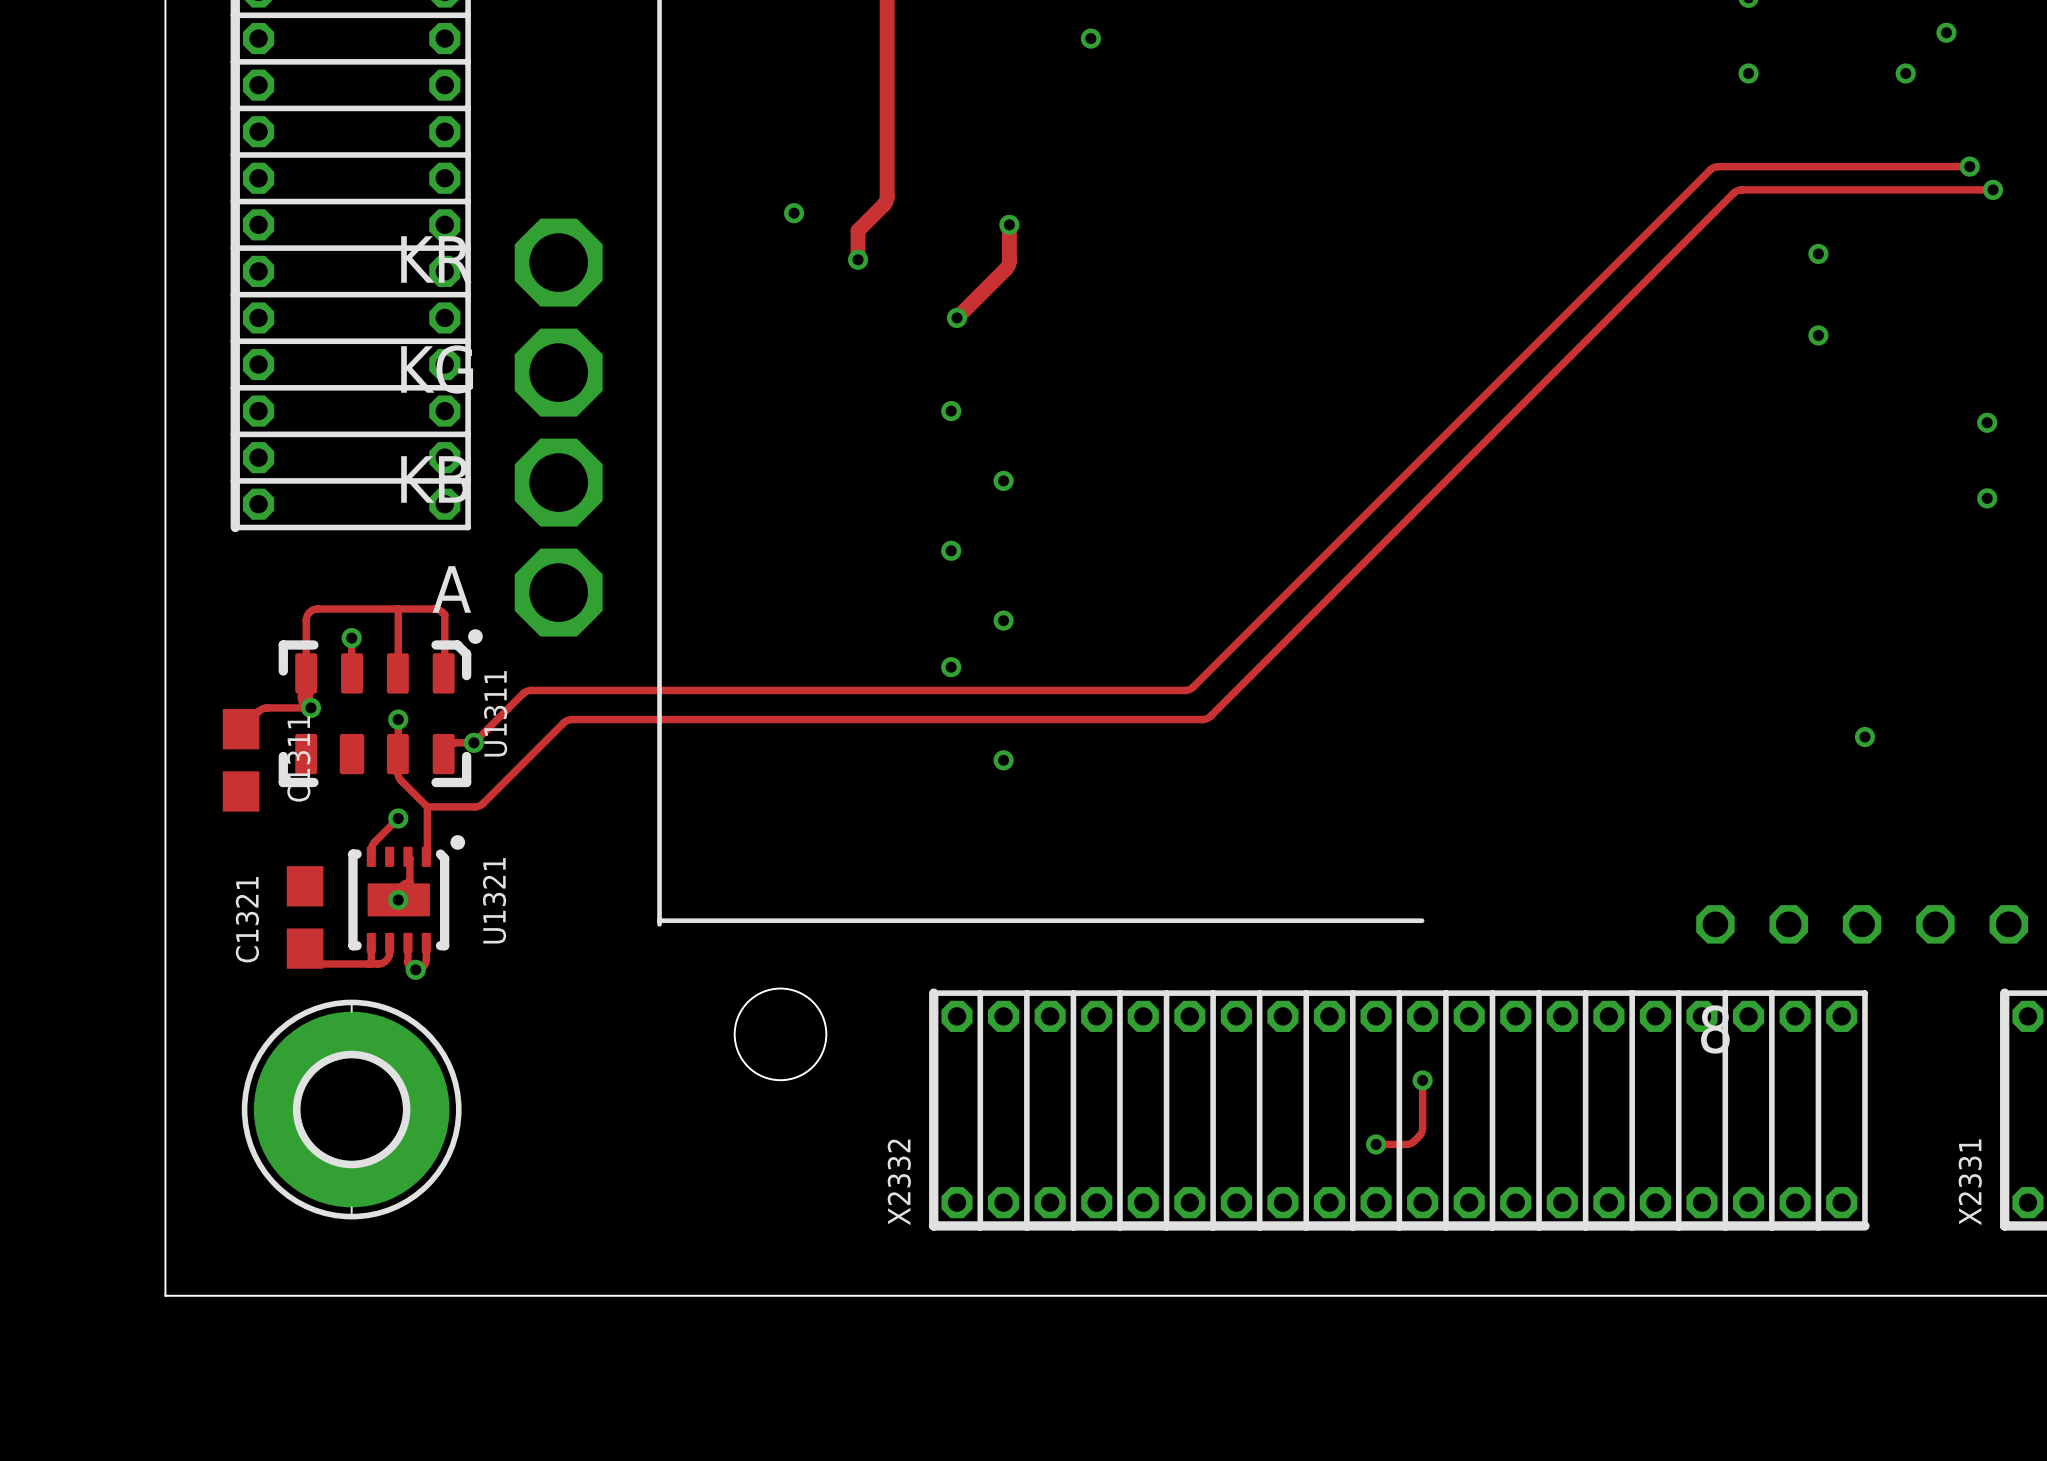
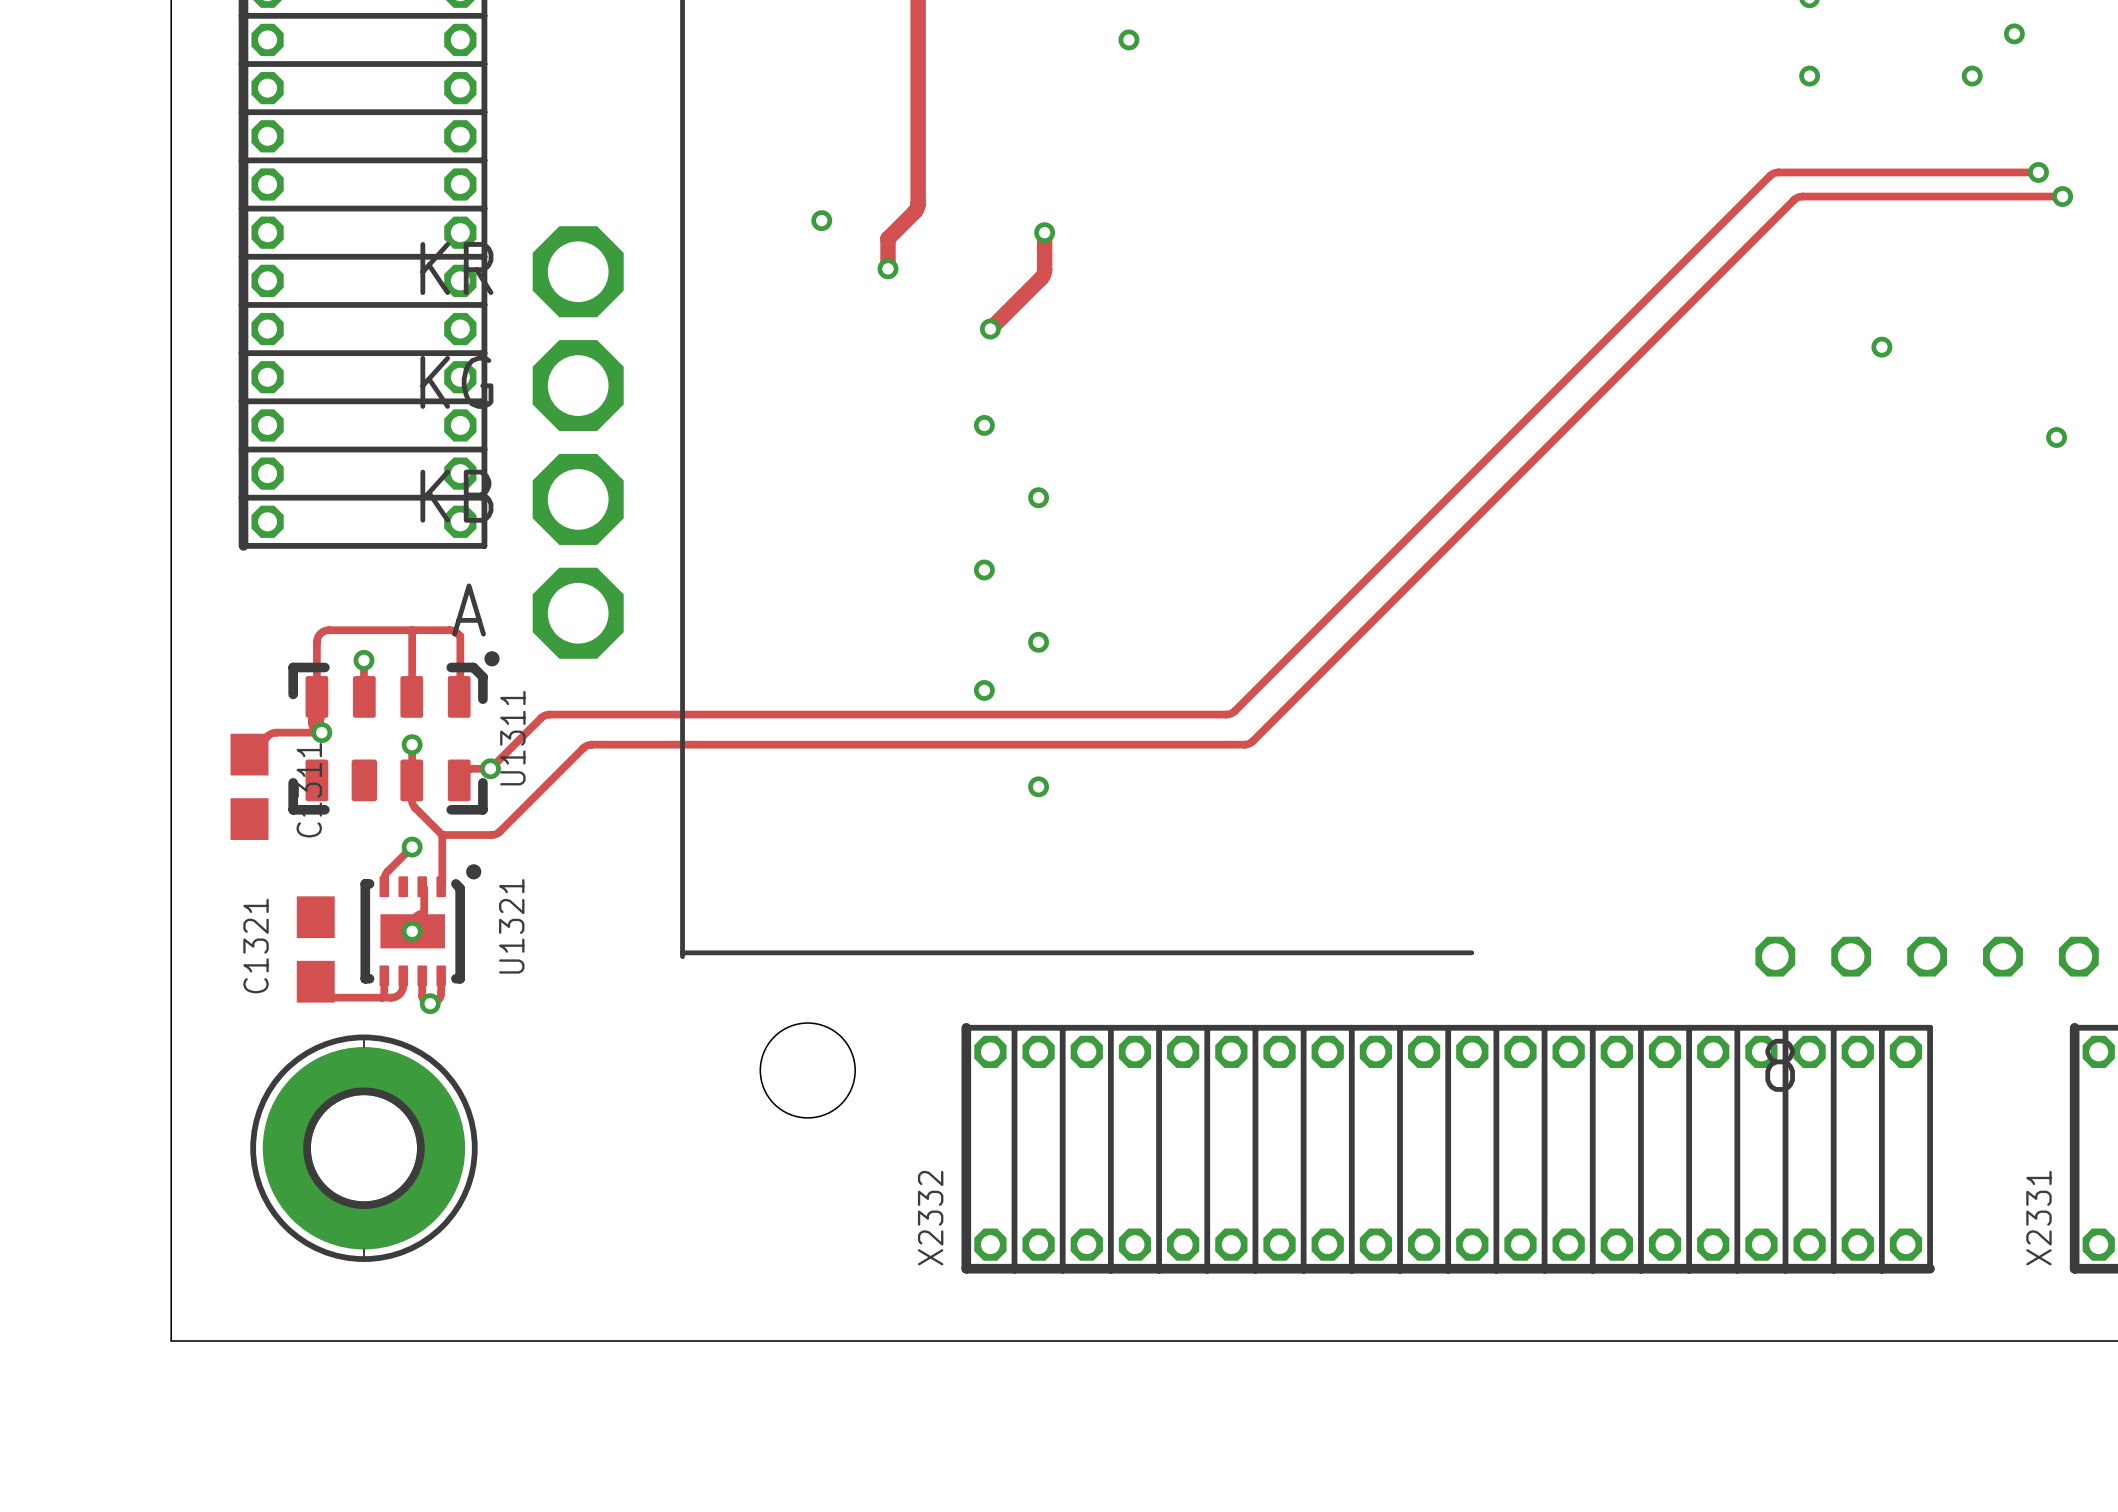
via: (1818, 253) -> none
via: (1987, 498) -> none
via: (1864, 737) -> none
track: (1422, 1080) (1422, 1127) (1420, 1135) (1409, 1144) (1376, 1144) -> none
via: (1422, 1080) -> none
via: (1376, 1144) -> none

